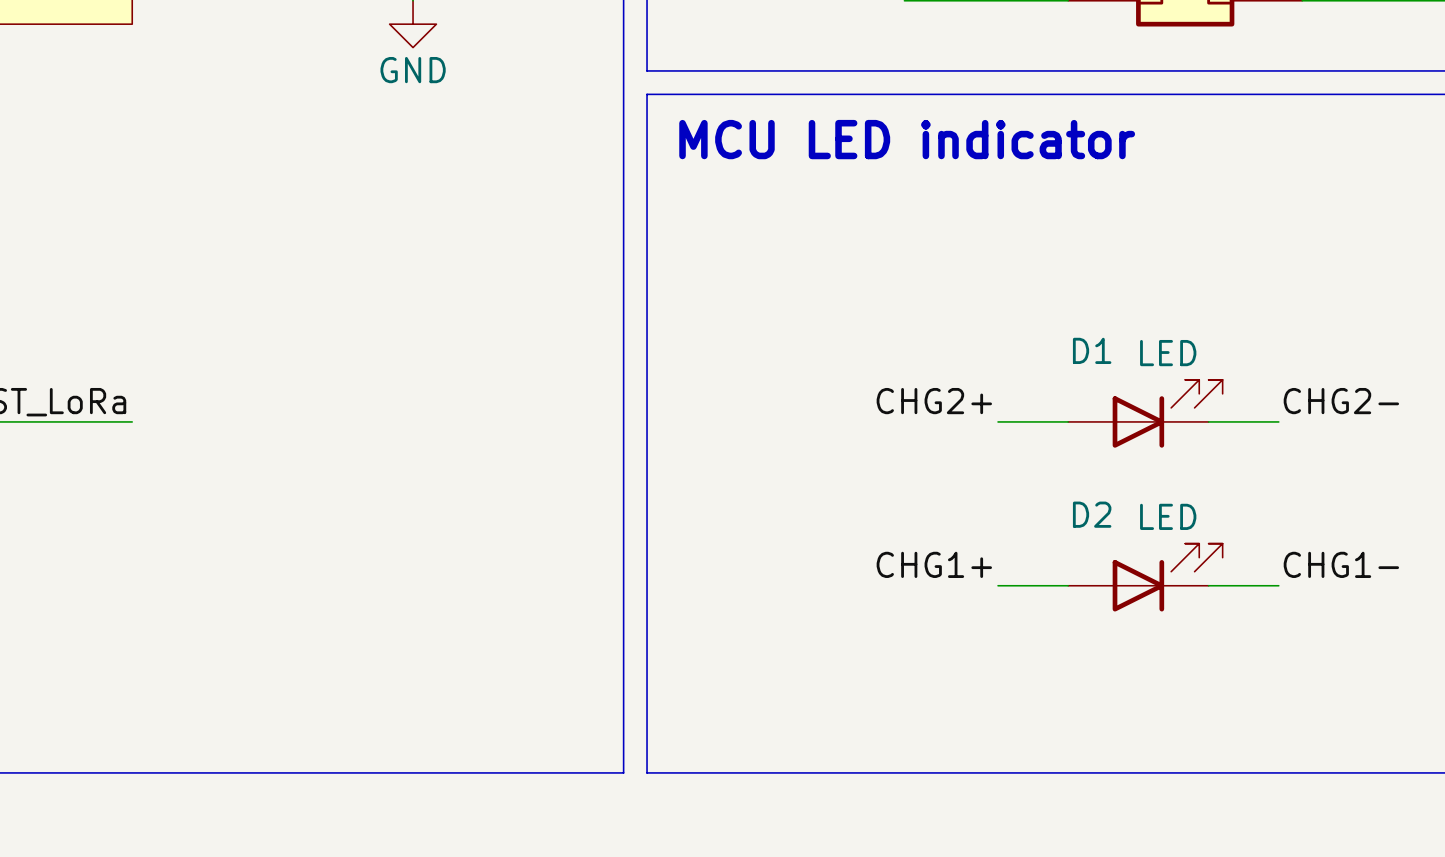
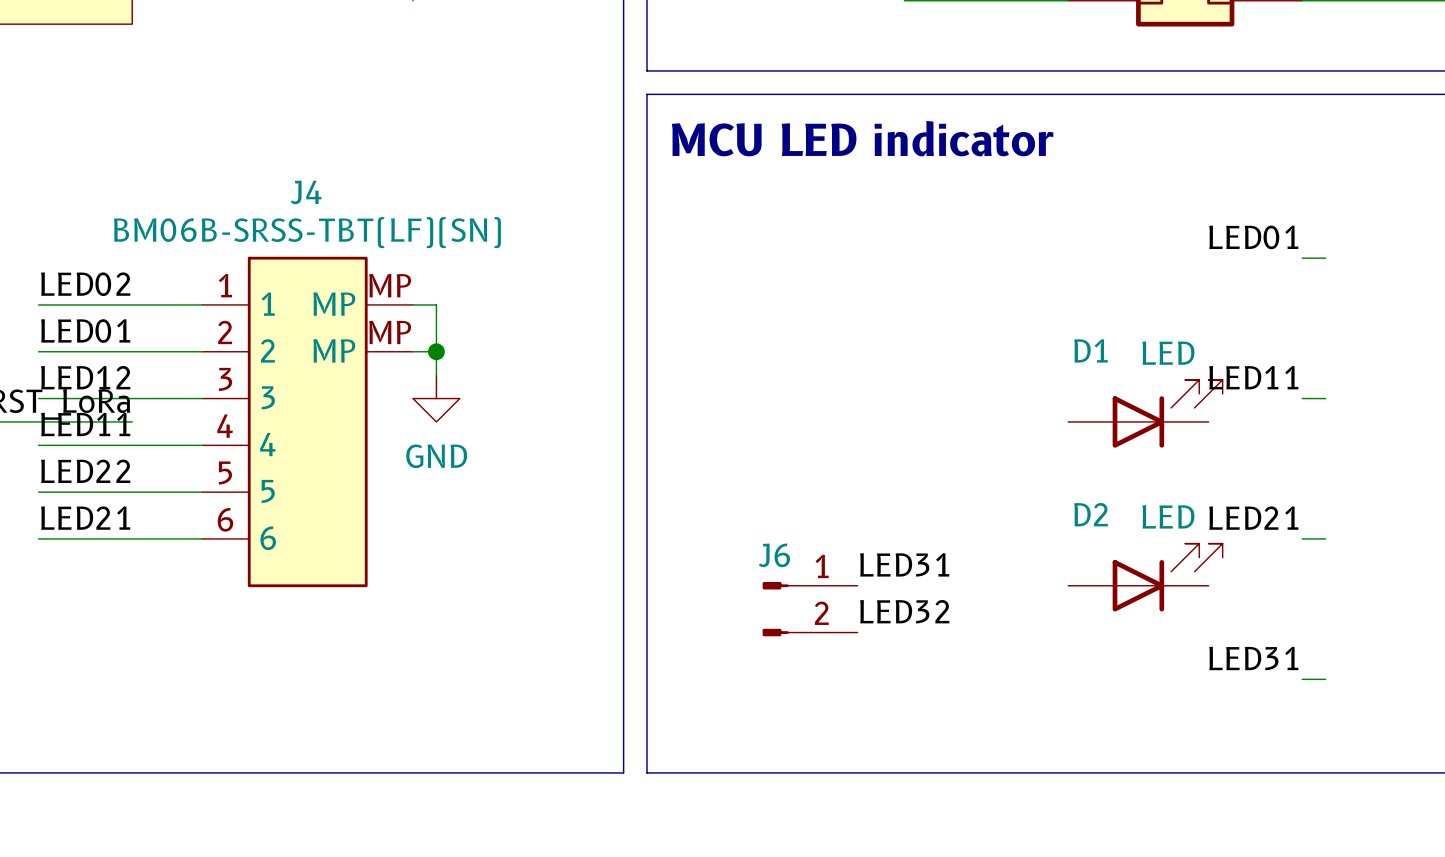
power symbol: GND (413, 24) -> none
label: none -> LED01 (1253, 237)
wire: none -> (1302, 258) (1325, 258)
label: none -> LED02 (85, 284)
wire: none -> (38, 304) (202, 304)
wire: none -> (413, 304) (436, 304) (436, 375)
label: none -> LED01 (85, 331)
wire: none -> (38, 351) (202, 351)
wire: none -> (413, 351) (436, 351)
junction: none -> (436, 351)
label: none -> LED12 (85, 377)
label: none -> LED11 (1253, 377)
wire: none -> (38, 398) (202, 398)
power symbol: none -> GND (436, 398)
wire: none -> (1302, 398) (1325, 398)
label: CHG2+ (934, 401) -> none
label: CHG2- (1341, 401) -> none
J4: none -> BM06B-SRSS-TBT(LF)(SN) (307, 421)
wire: (998, 421) (1068, 421) -> none
wire: (1208, 421) (1278, 421) -> none
label: none -> LED11 (85, 424)
wire: none -> (38, 445) (202, 445)
label: none -> LED22 (85, 471)
wire: none -> (38, 492) (202, 492)
label: none -> LED21 (85, 518)
label: none -> LED21 (1253, 518)
wire: none -> (38, 538) (202, 538)
wire: none -> (1302, 538) (1325, 538)
label: none -> LED31 (904, 564)
label: CHG1+ (934, 564) -> none
label: CHG1- (1341, 564) -> none
wire: (998, 585) (1068, 585) -> none
wire: (1208, 585) (1278, 585) -> none
J6: none -> (810, 609)
label: none -> LED32 (904, 611)
label: none -> LED31 (1253, 658)
wire: none -> (1302, 679) (1325, 679)

